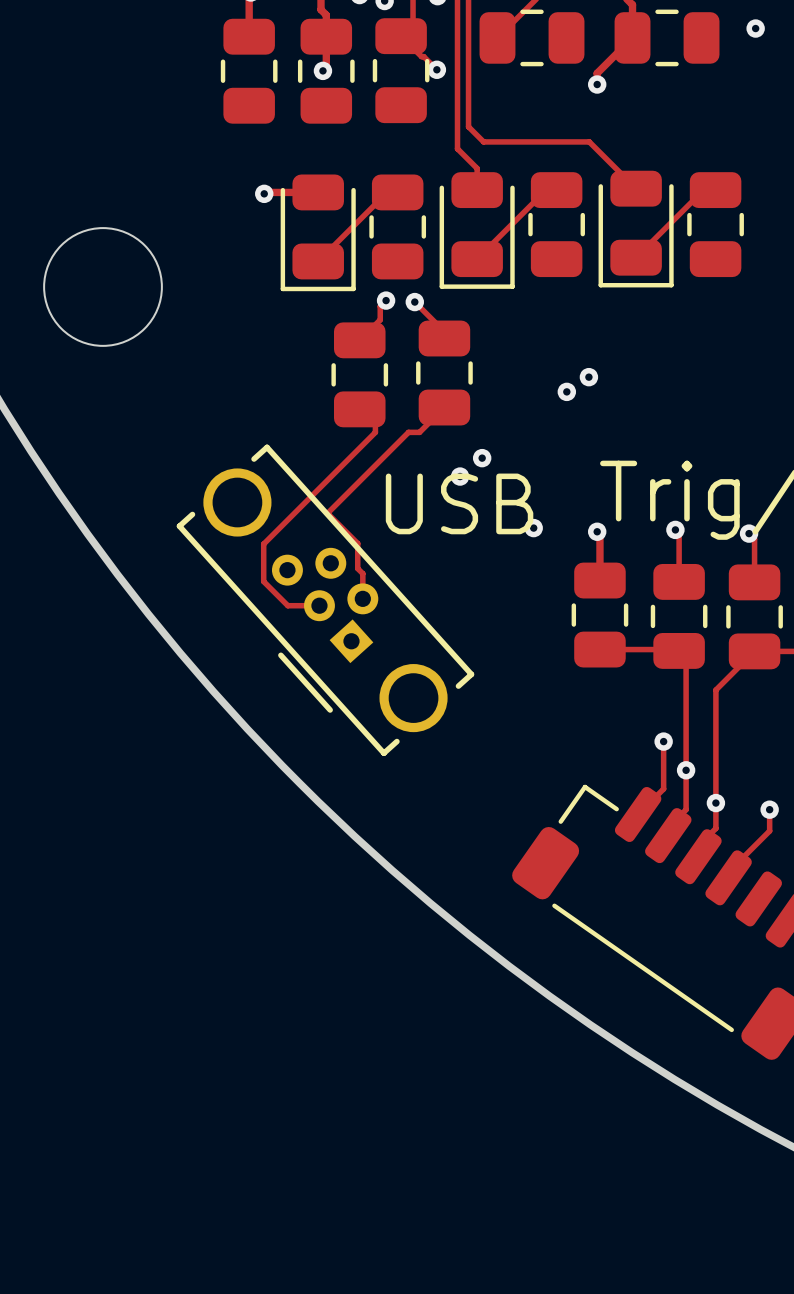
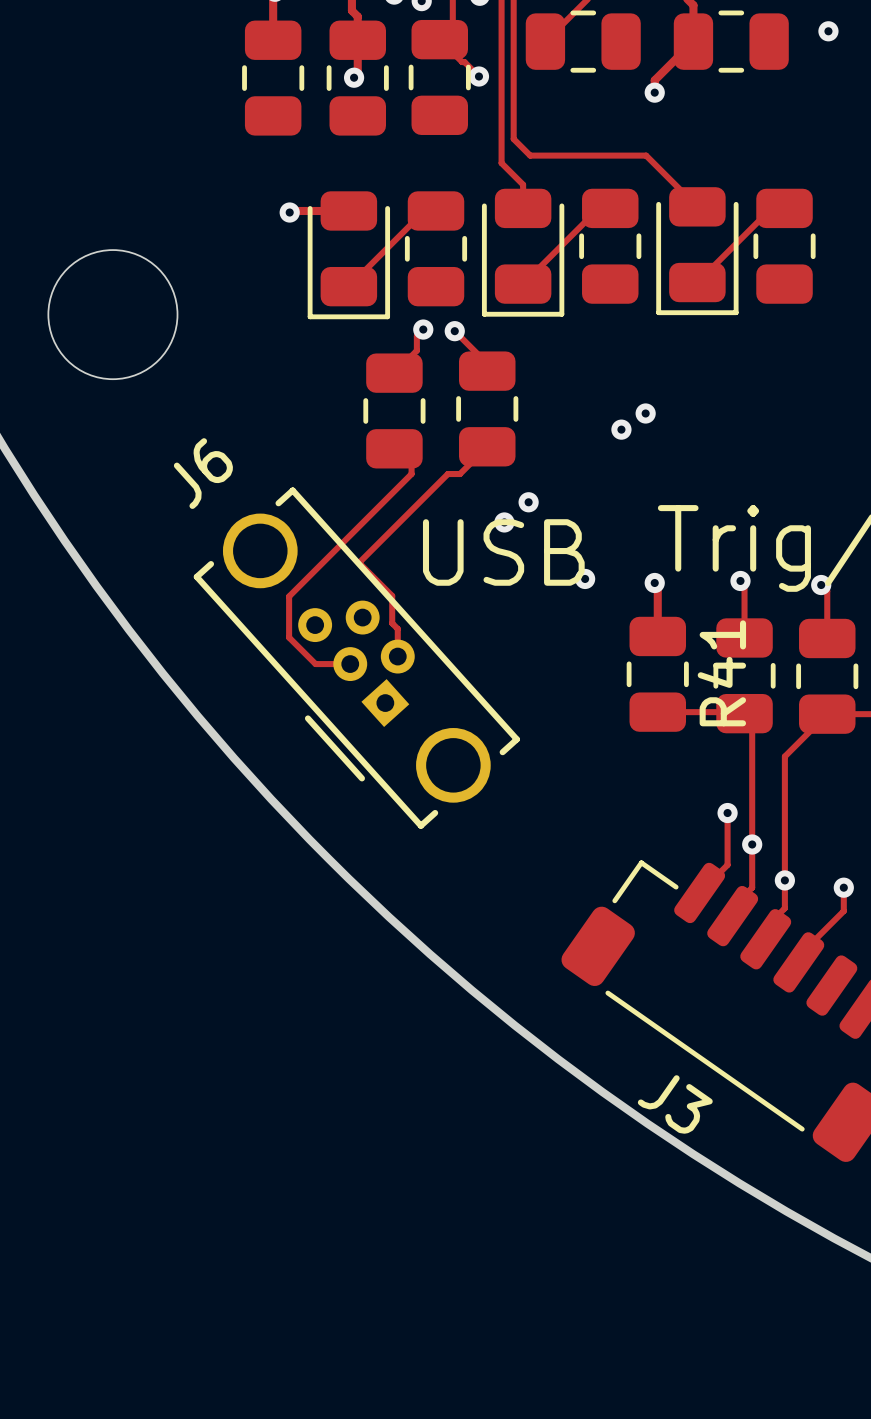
J6 name: none -> J6 (203, 473)
R41 name: none -> R41 (721, 673)
J3 name: none -> J3 (675, 1104)

